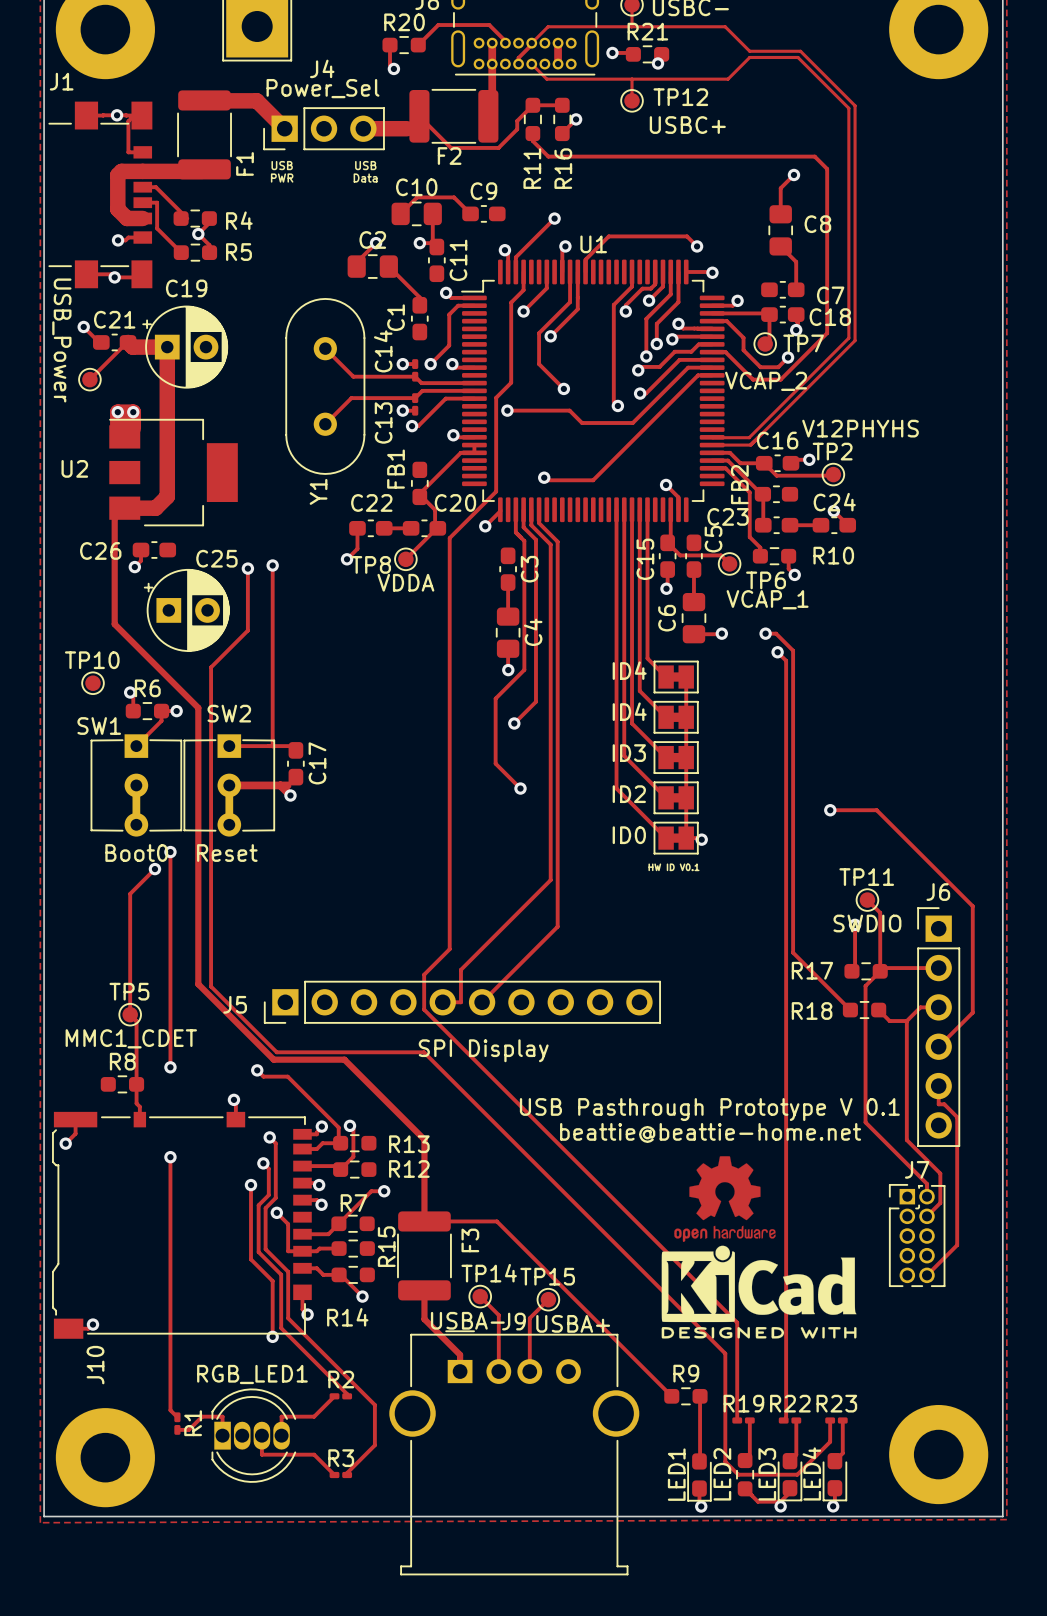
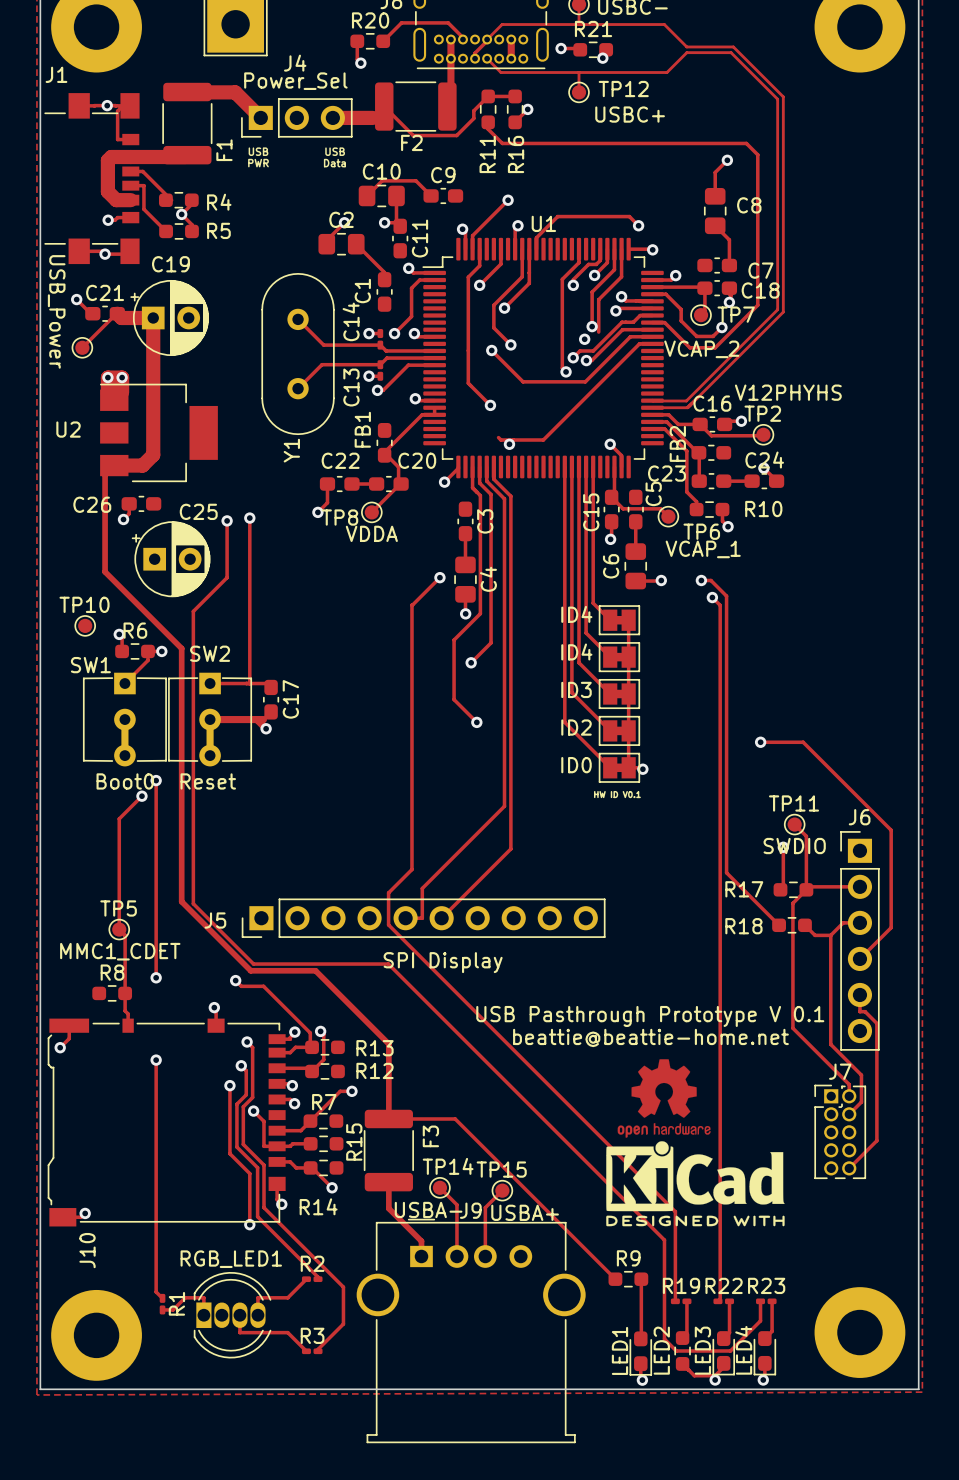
track: (656, 323) (656, 344) -> (601, 296) (598, 299) (598, 332)
via: (656, 344) -> none
track: (679, 351) (674, 351) (659, 366) (638, 366) (638, 370) -> (622, 322) (593, 350) (580, 350) (573, 357)
track: (539, 357) (539, 364) (563, 388) -> (493, 327) (510, 344)
track: (511, 382) (496, 397) (496, 491) (449, 538) (449, 660) -> (468, 350) (468, 383) (490, 405)
via: none -> (491, 350)
via position: (563, 388) -> (510, 344)
via: none -> (573, 357)
track: (507, 410) (569, 410) (582, 423) (632, 423) (638, 416) -> (491, 350) (523, 381) (585, 381)
via: (507, 410) -> none
via: none -> (490, 405)
via position: (544, 477) -> (509, 444)
track: none -> (439, 577) (411, 605)
via: none -> (439, 577)

